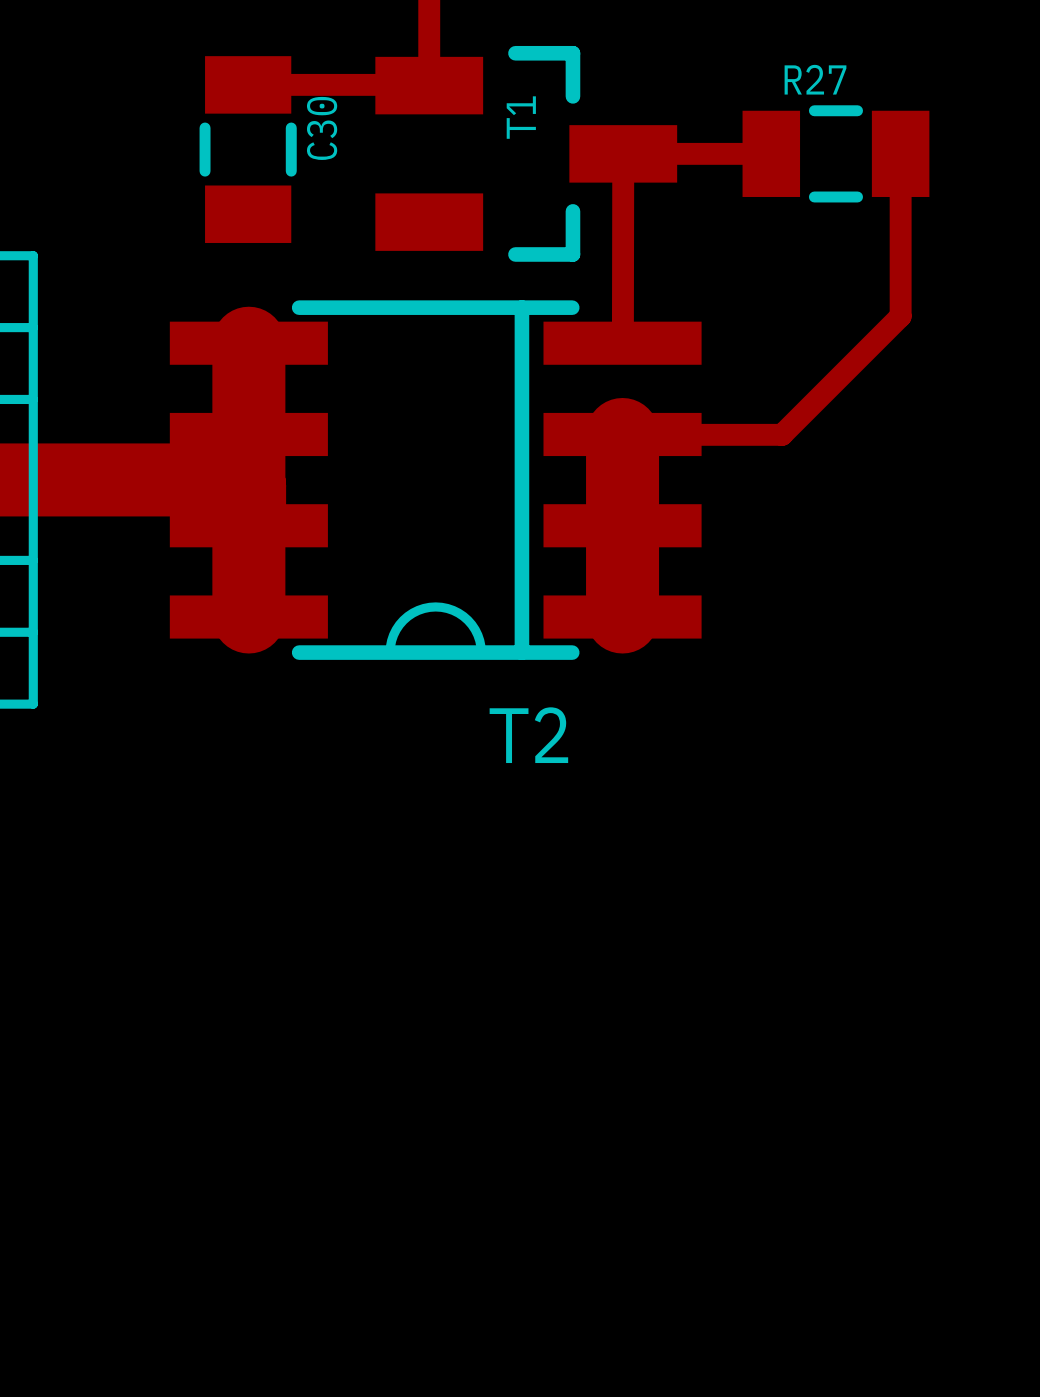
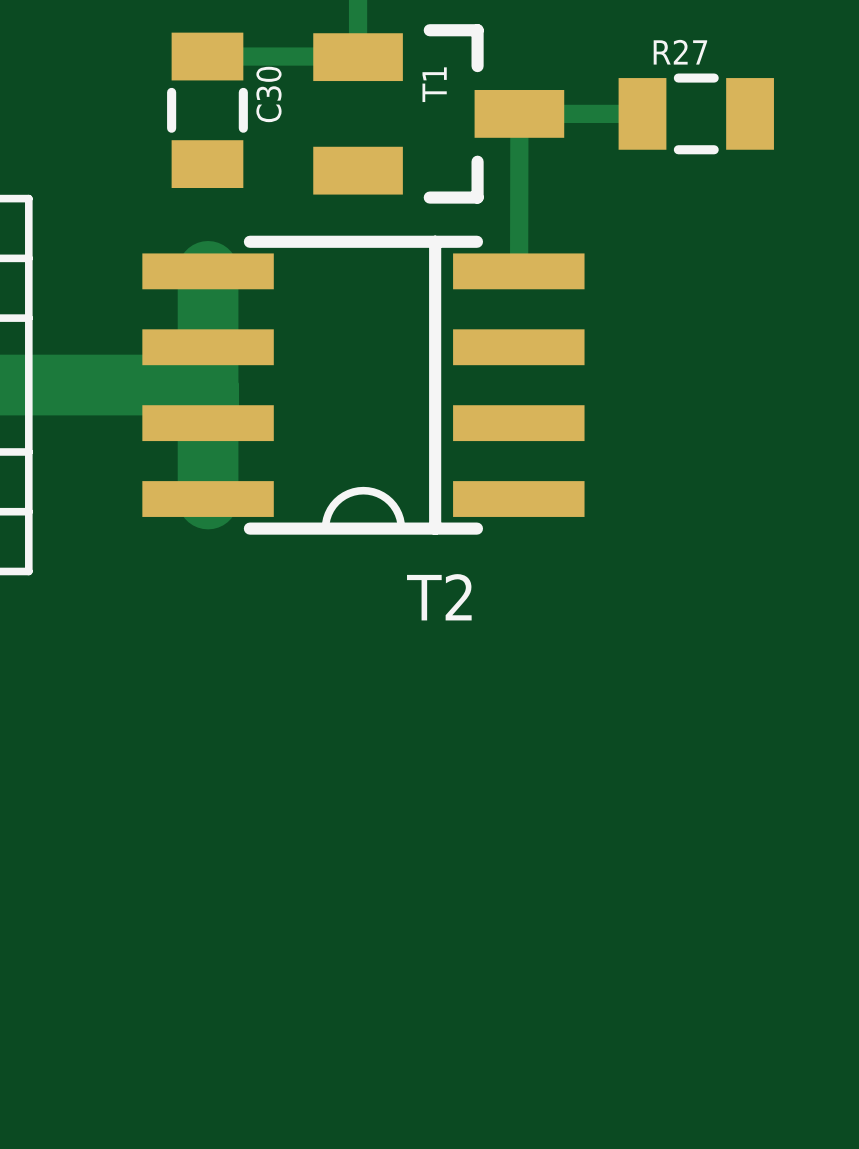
track: (900, 153) (900, 316) (782, 434) (622, 434) -> none
track: (622, 434) (622, 617) -> none

